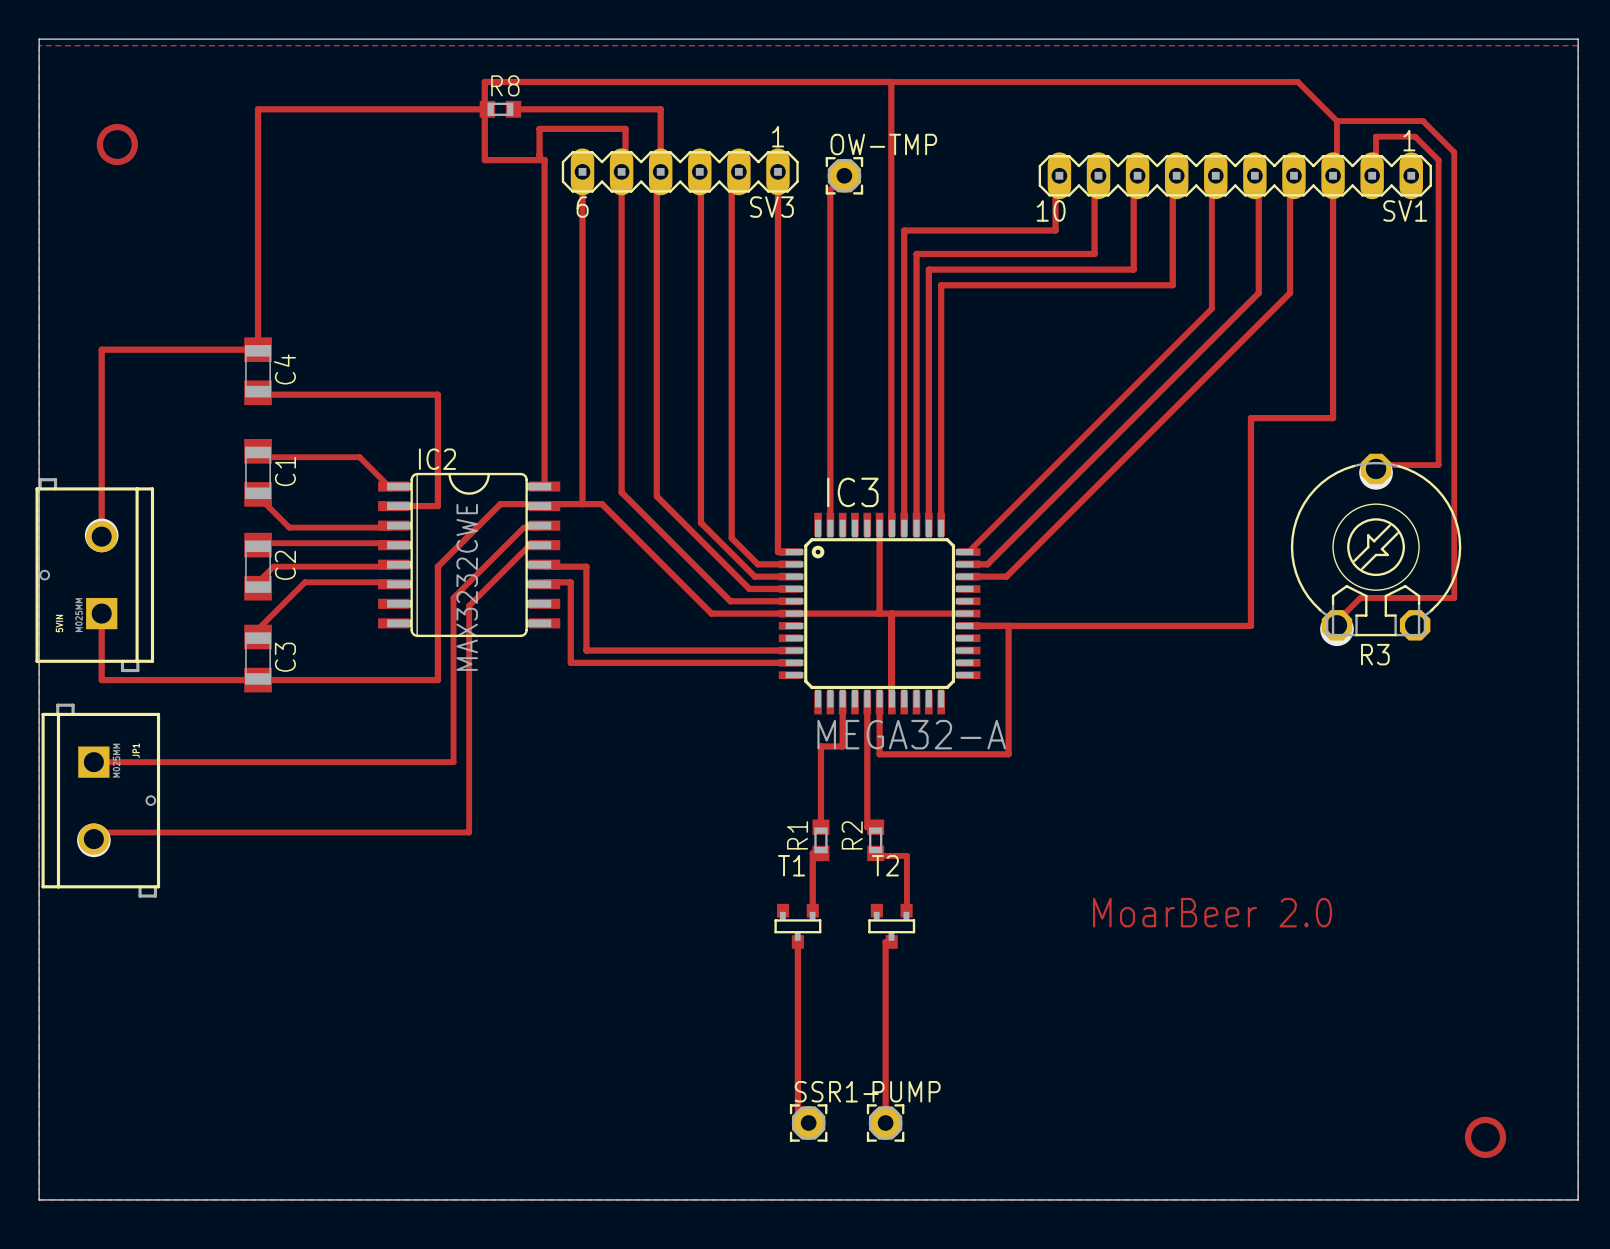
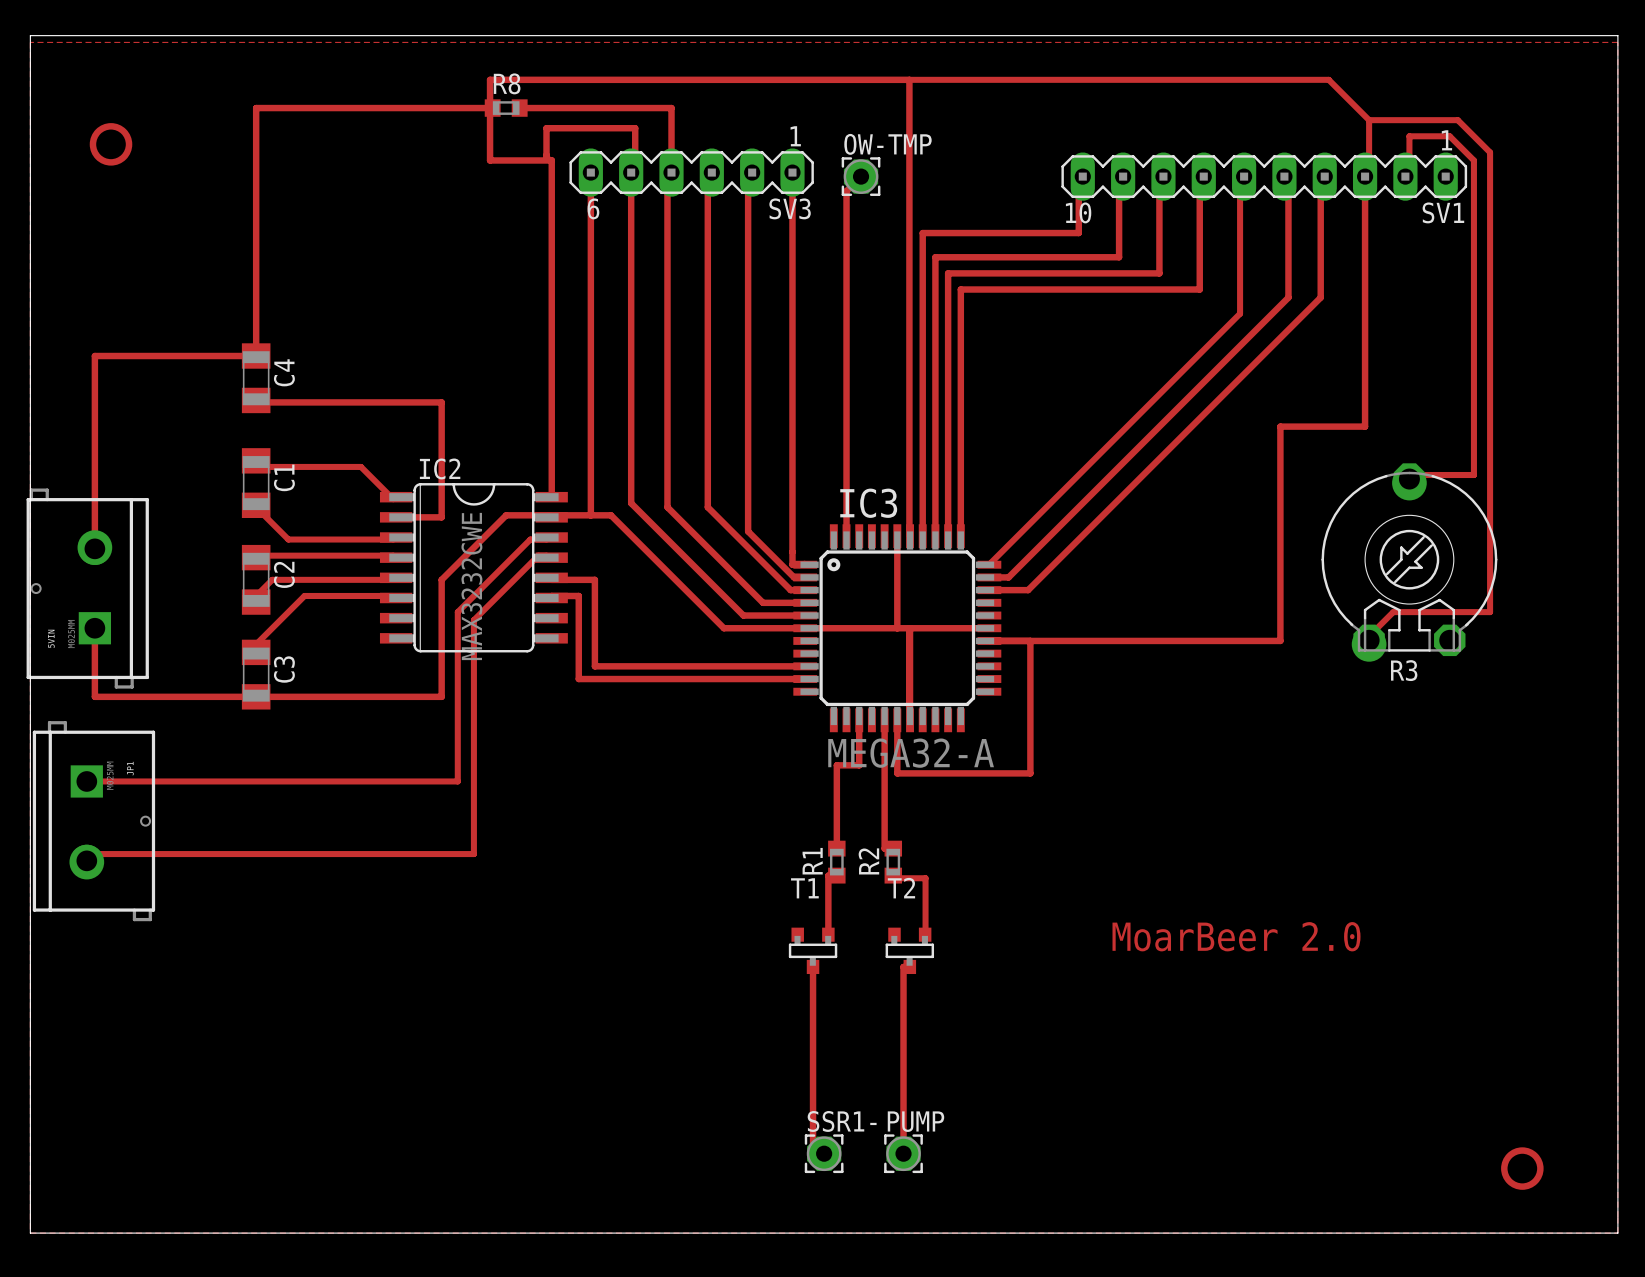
track: (699, 171) (700, 522) (754, 576) (776, 576) -> (711, 172) (707, 176) (707, 507) (790, 590)
track: (734, 175) (731, 179) (731, 538) (757, 564) (779, 564) -> (748, 176) (748, 531) (794, 577)

